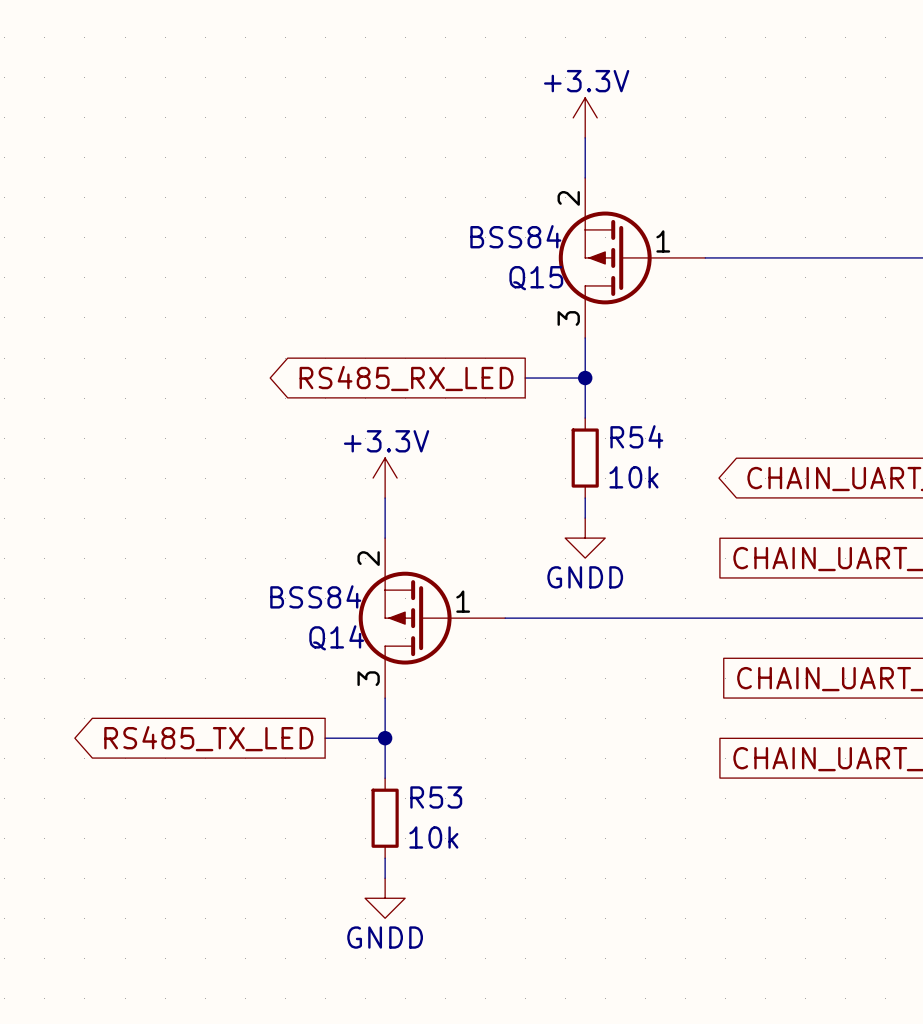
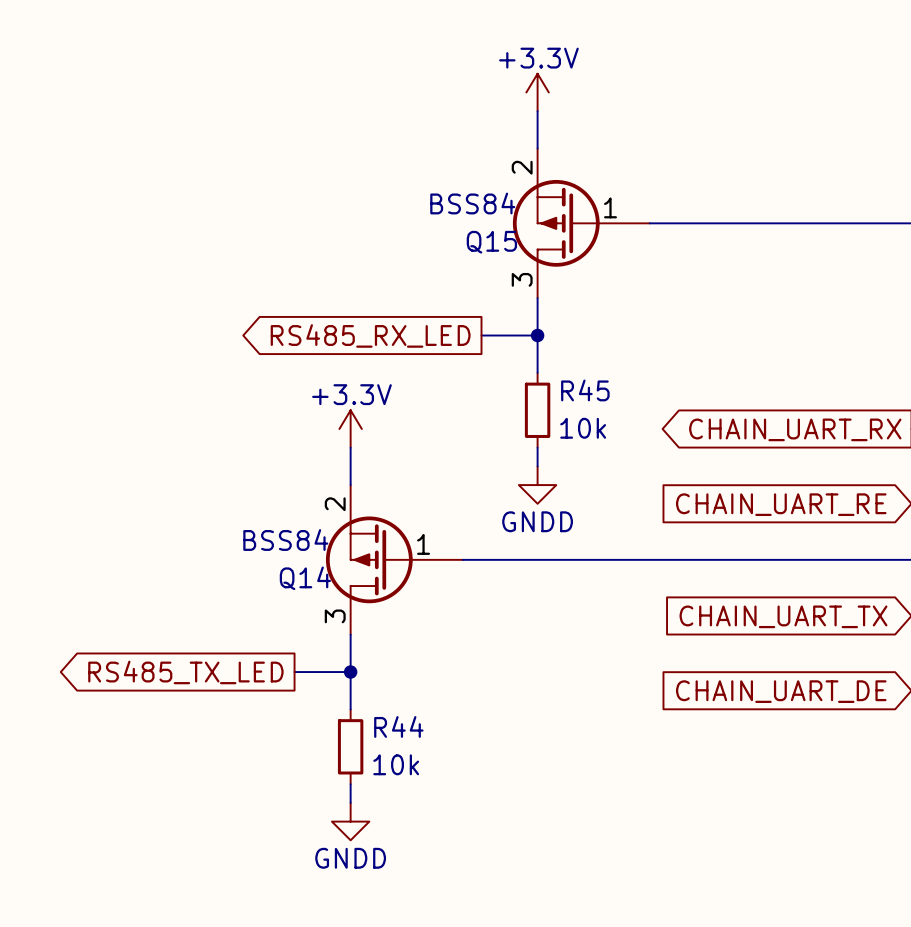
R54 name: R54 (636, 436) -> R45 (585, 390)
R53 name: R53 (436, 797) -> R44 (398, 726)

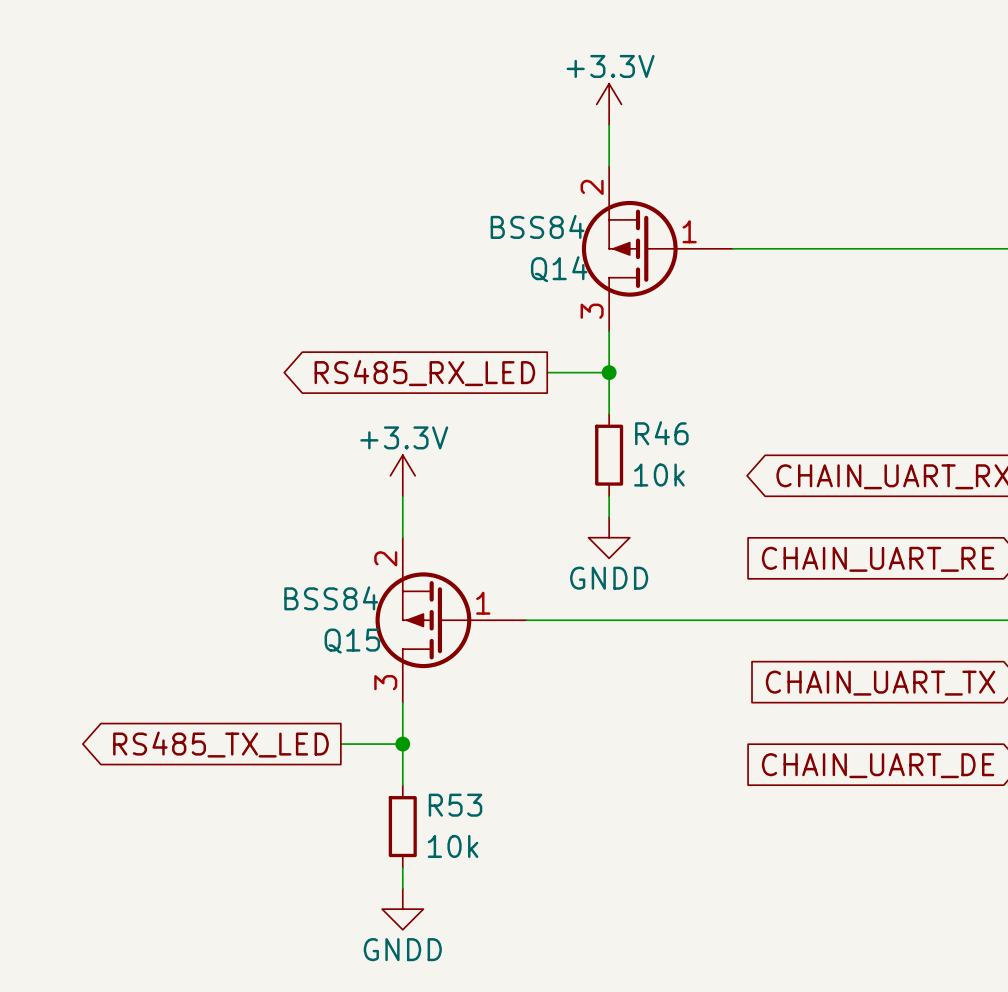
Q15 name: Q15 (491, 242) -> Q14 (559, 269)
R45 name: R45 (585, 390) -> R46 (661, 433)
Q14 name: Q14 (305, 578) -> Q15 (352, 641)
R44 name: R44 (398, 726) -> R53 (455, 805)

